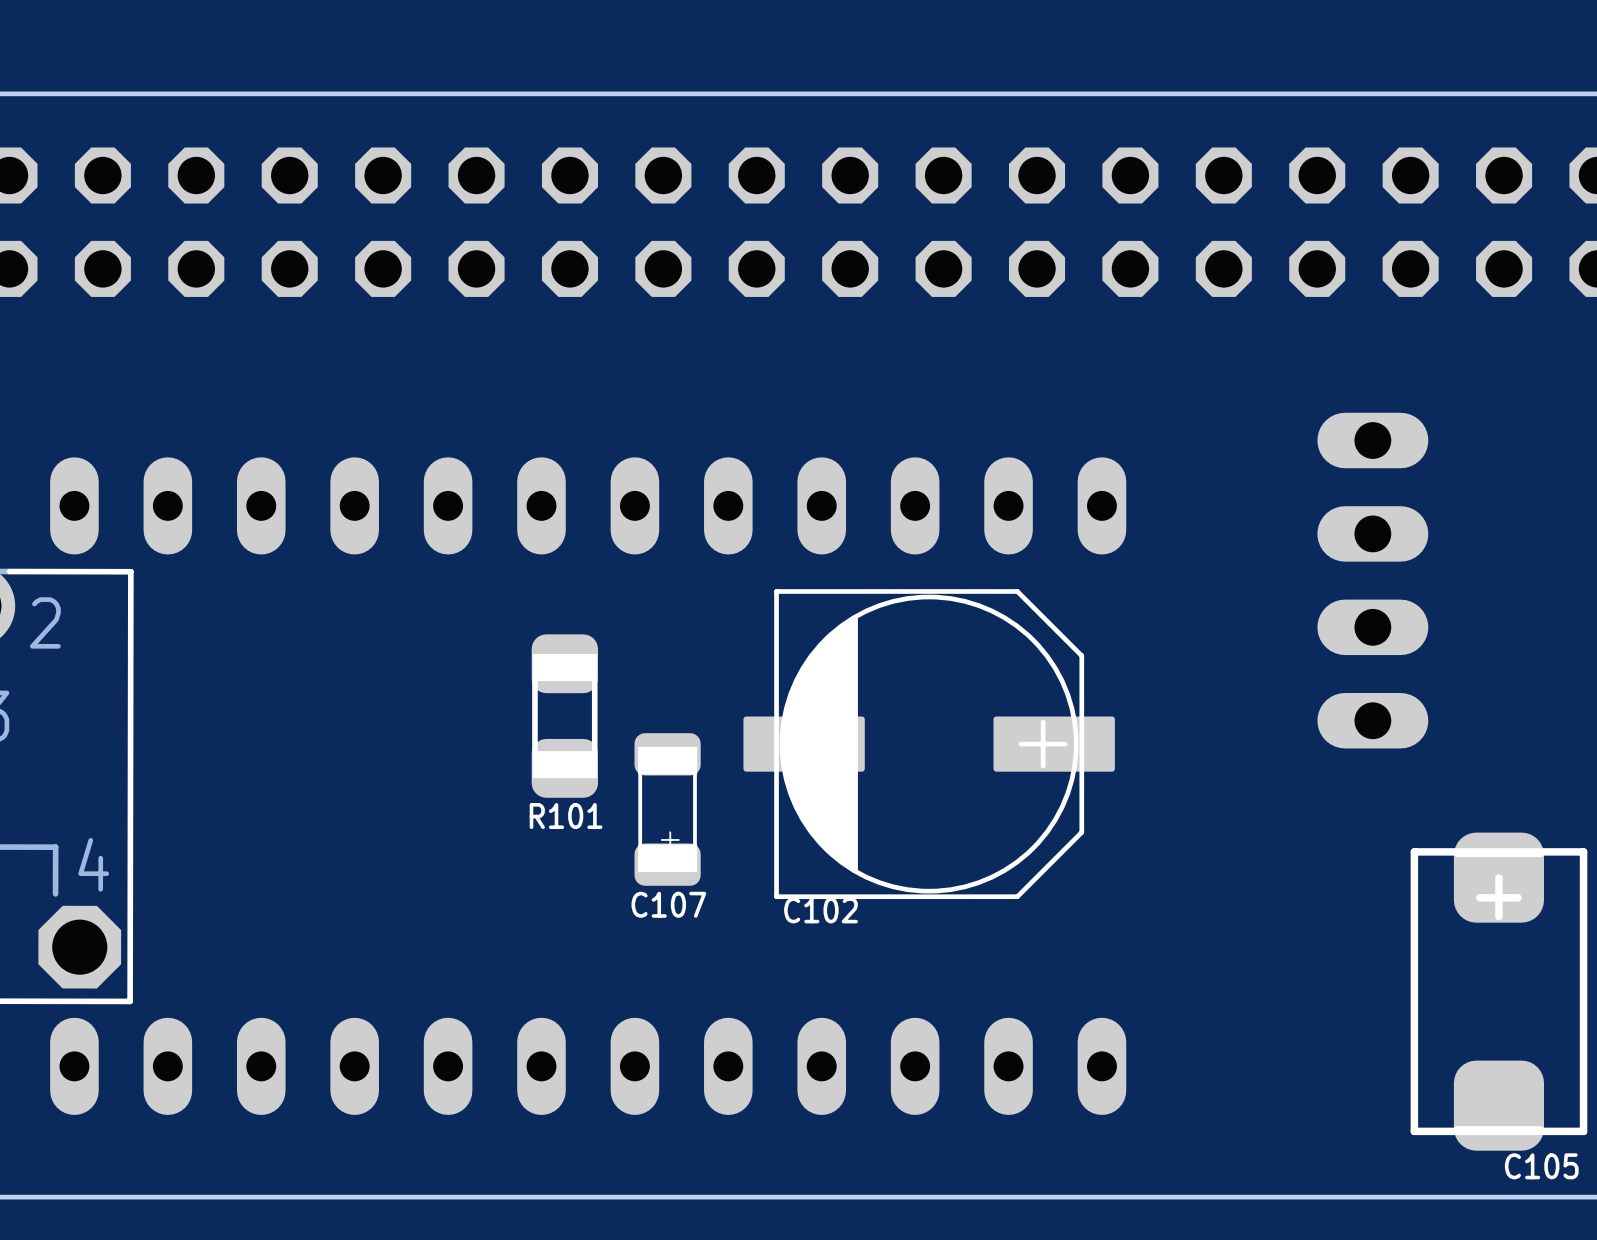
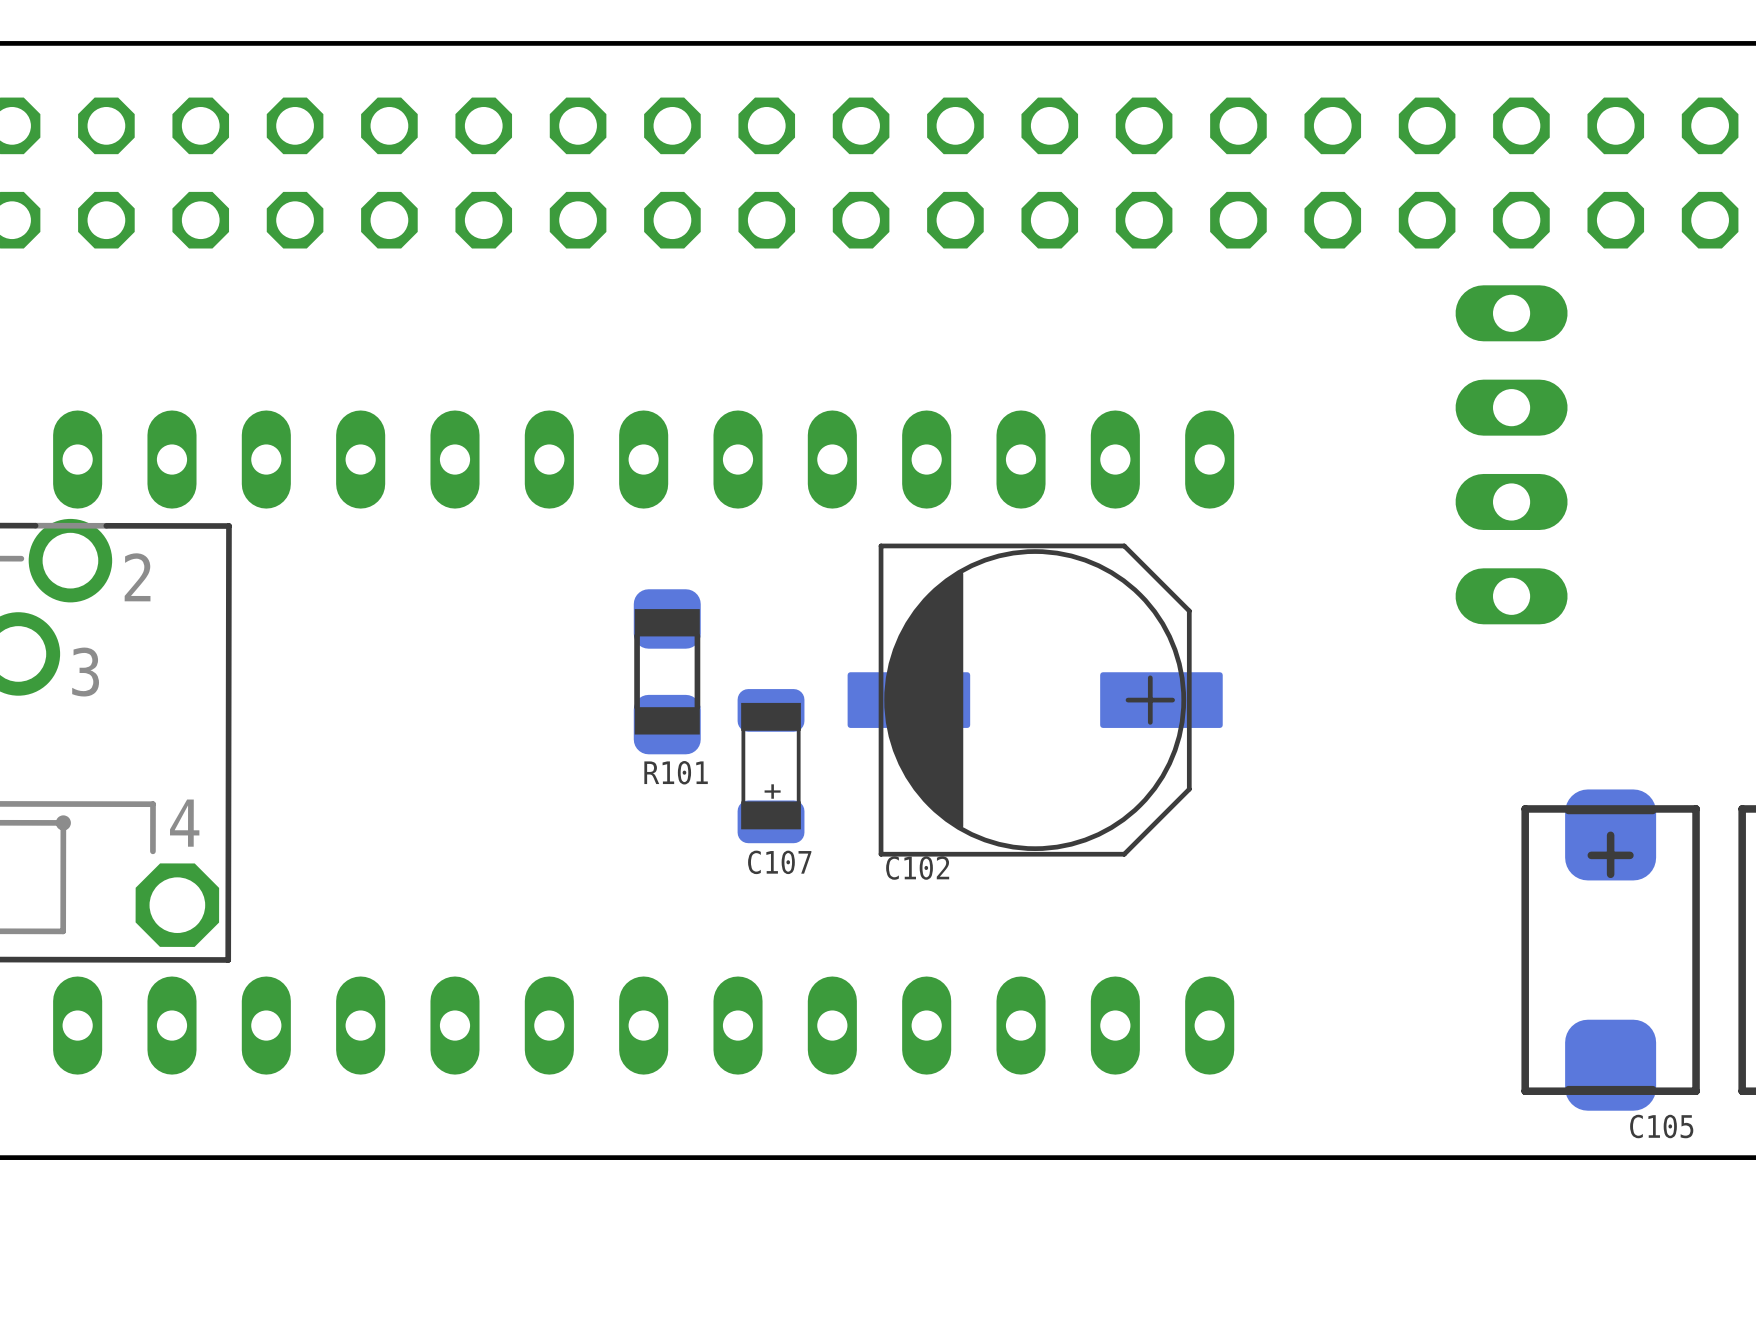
part position: (1372, 580) -> (1511, 454)

